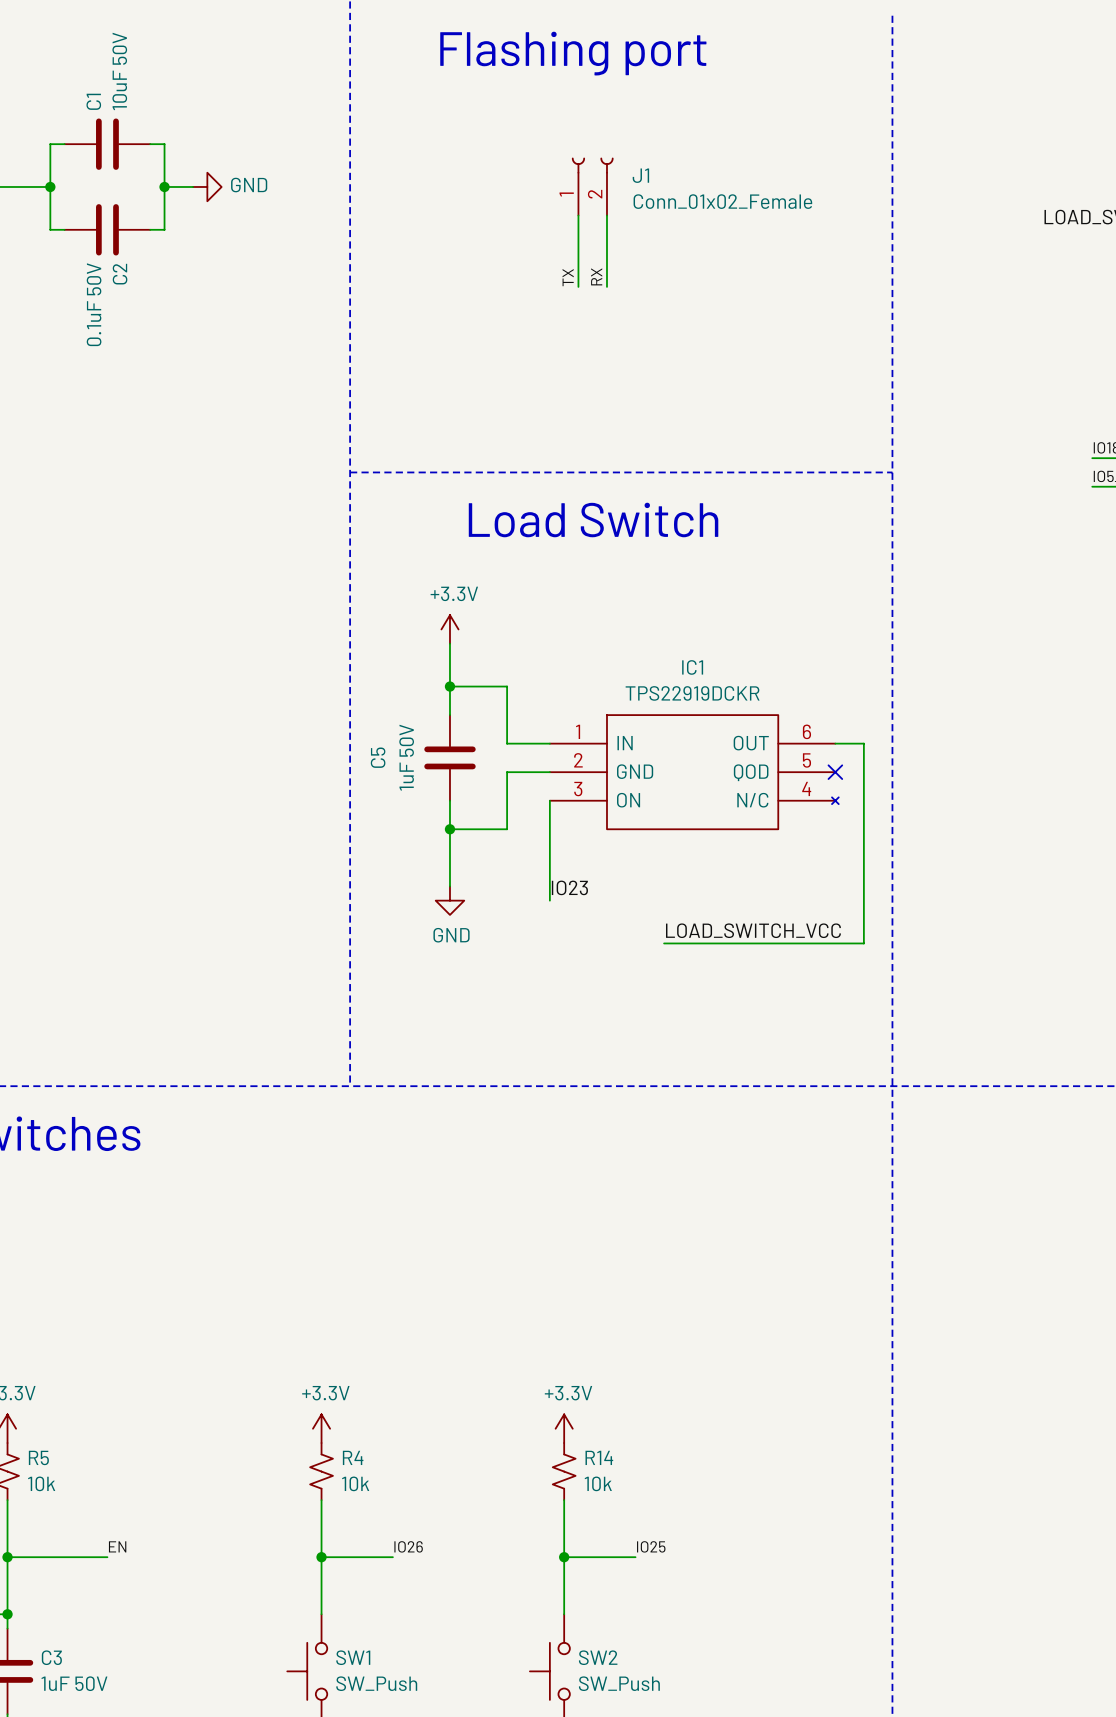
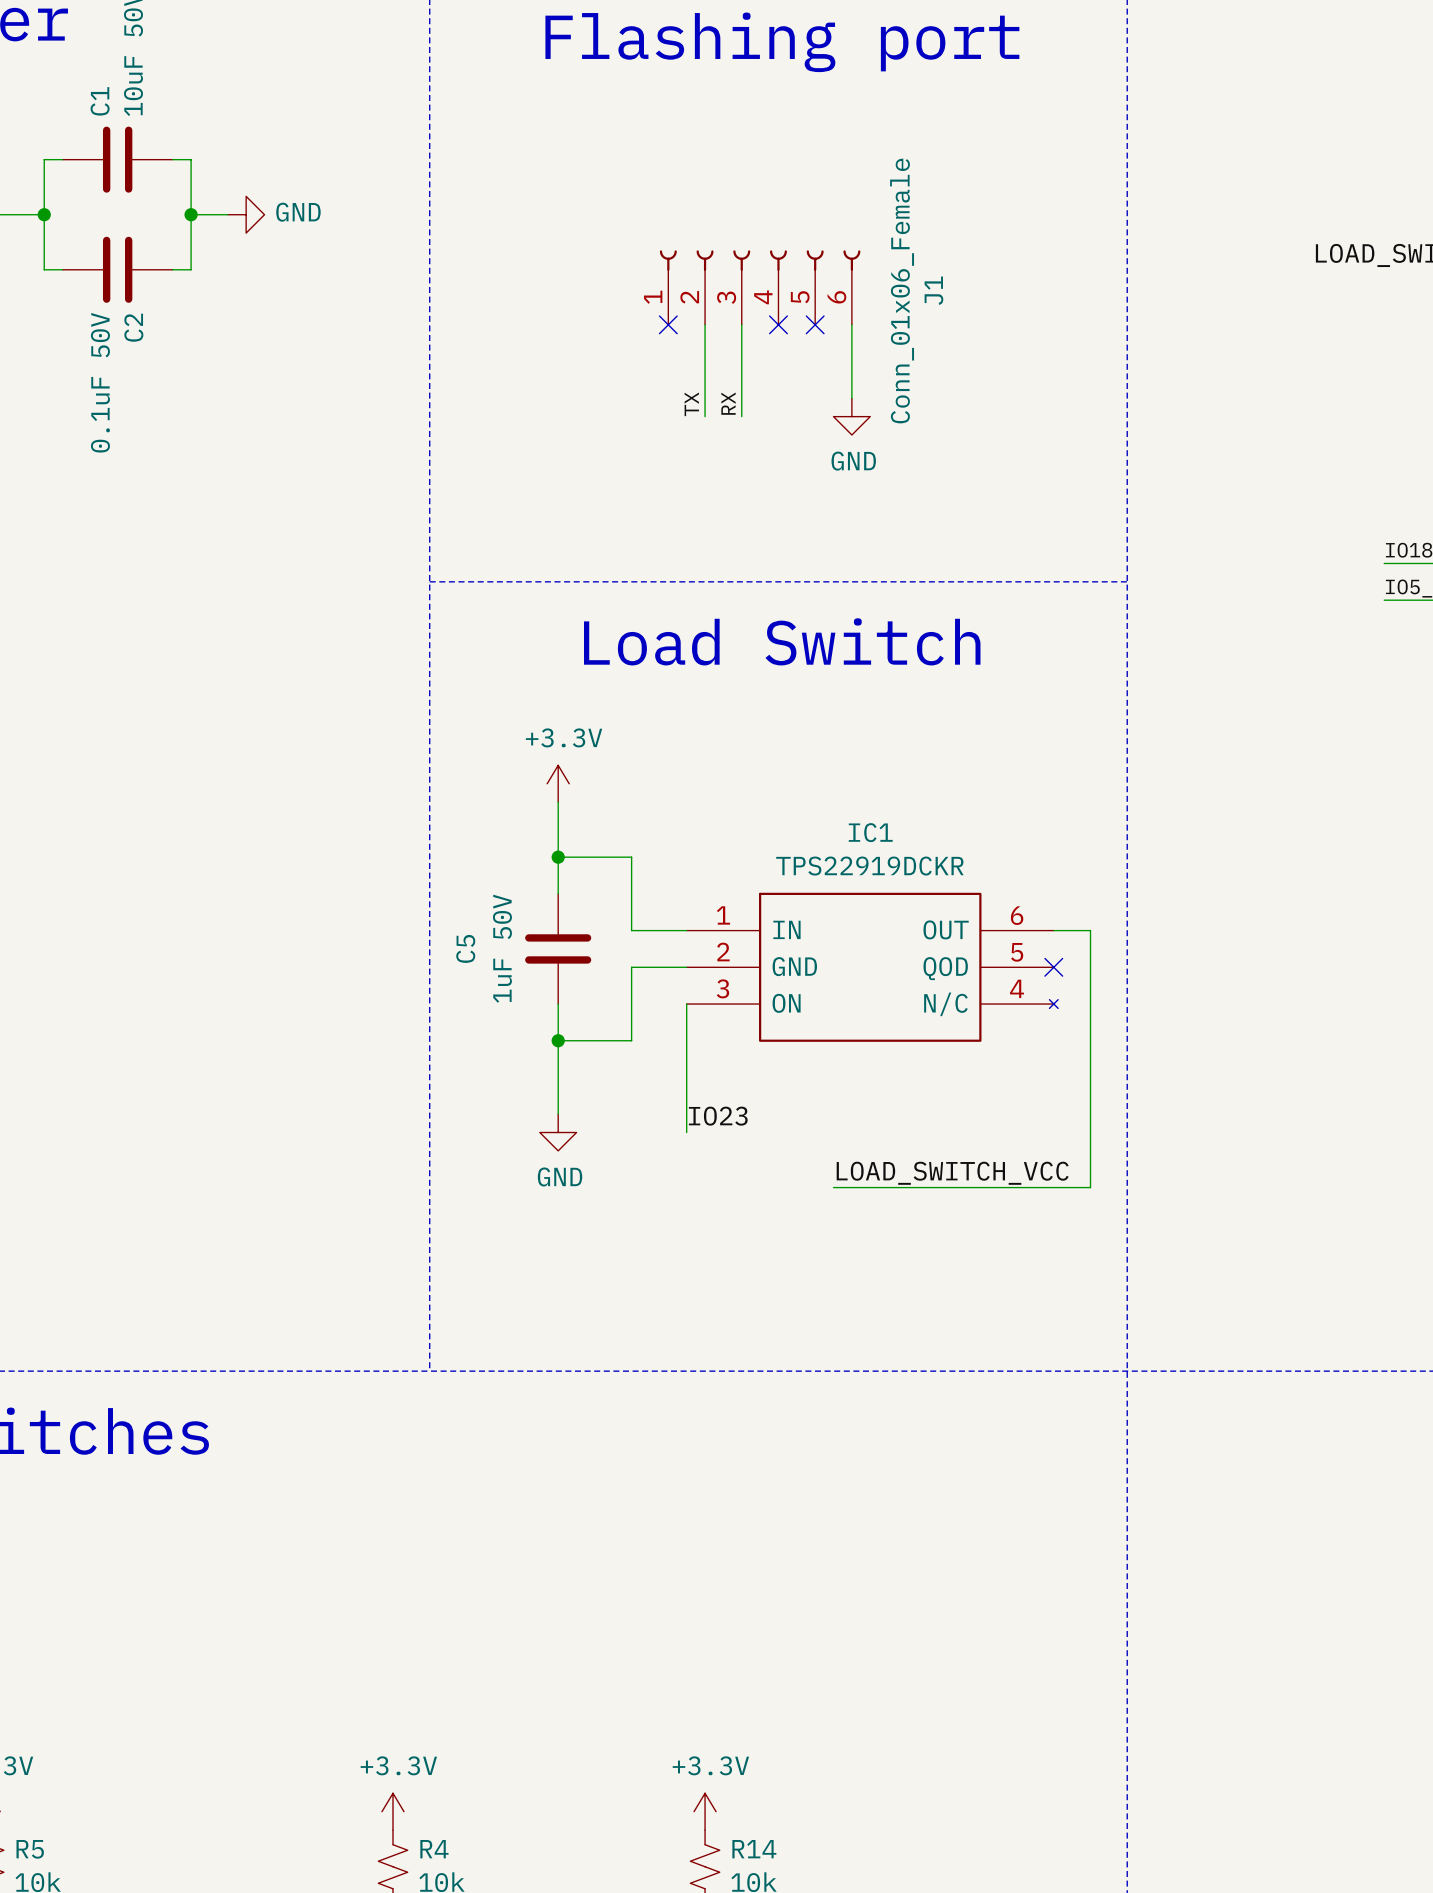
J1 symbol: [571, 157, 614, 216] -> [659, 250, 861, 325]
J1 name position: J1 (640, 175) -> J1 (933, 290)
J1 value: Conn_01x02_Female (722, 201) -> Conn_01x06_Female (902, 291)
wire: (578, 215) (578, 286) -> (741, 324) (741, 416)
wire: (606, 215) (606, 286) -> (705, 324) (705, 416)
no-connect mark: none -> (668, 324)
no-connect mark: none -> (778, 324)
no-connect mark: none -> (815, 324)
wire: none -> (851, 324) (851, 398)
label position: RX (596, 276) -> RX (728, 403)
label position: TX (568, 277) -> TX (691, 404)
power symbol: none -> GND (851, 416)

